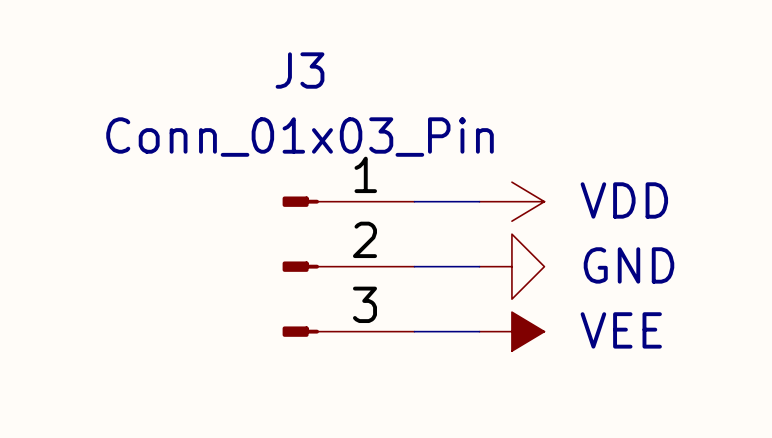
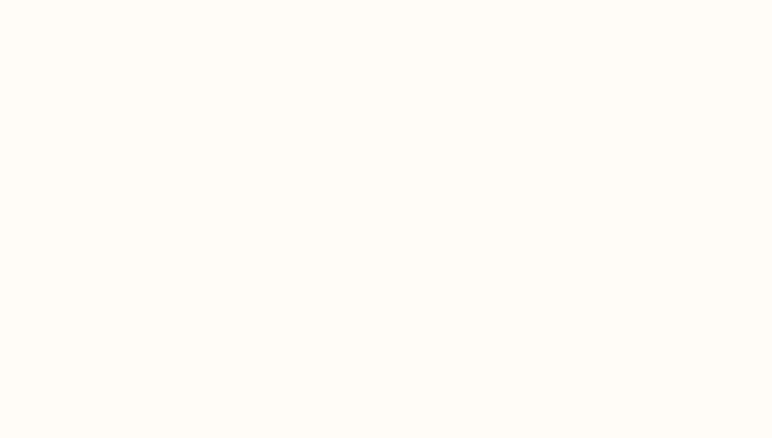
wire: (414, 201) (479, 201) -> none
power symbol: VDD (511, 201) -> none
J3: Conn_01x03_Pin (348, 266) -> none
wire: (414, 266) (479, 266) -> none
power symbol: GND (511, 266) -> none
wire: (414, 331) (479, 331) -> none
power symbol: VEE (511, 331) -> none

